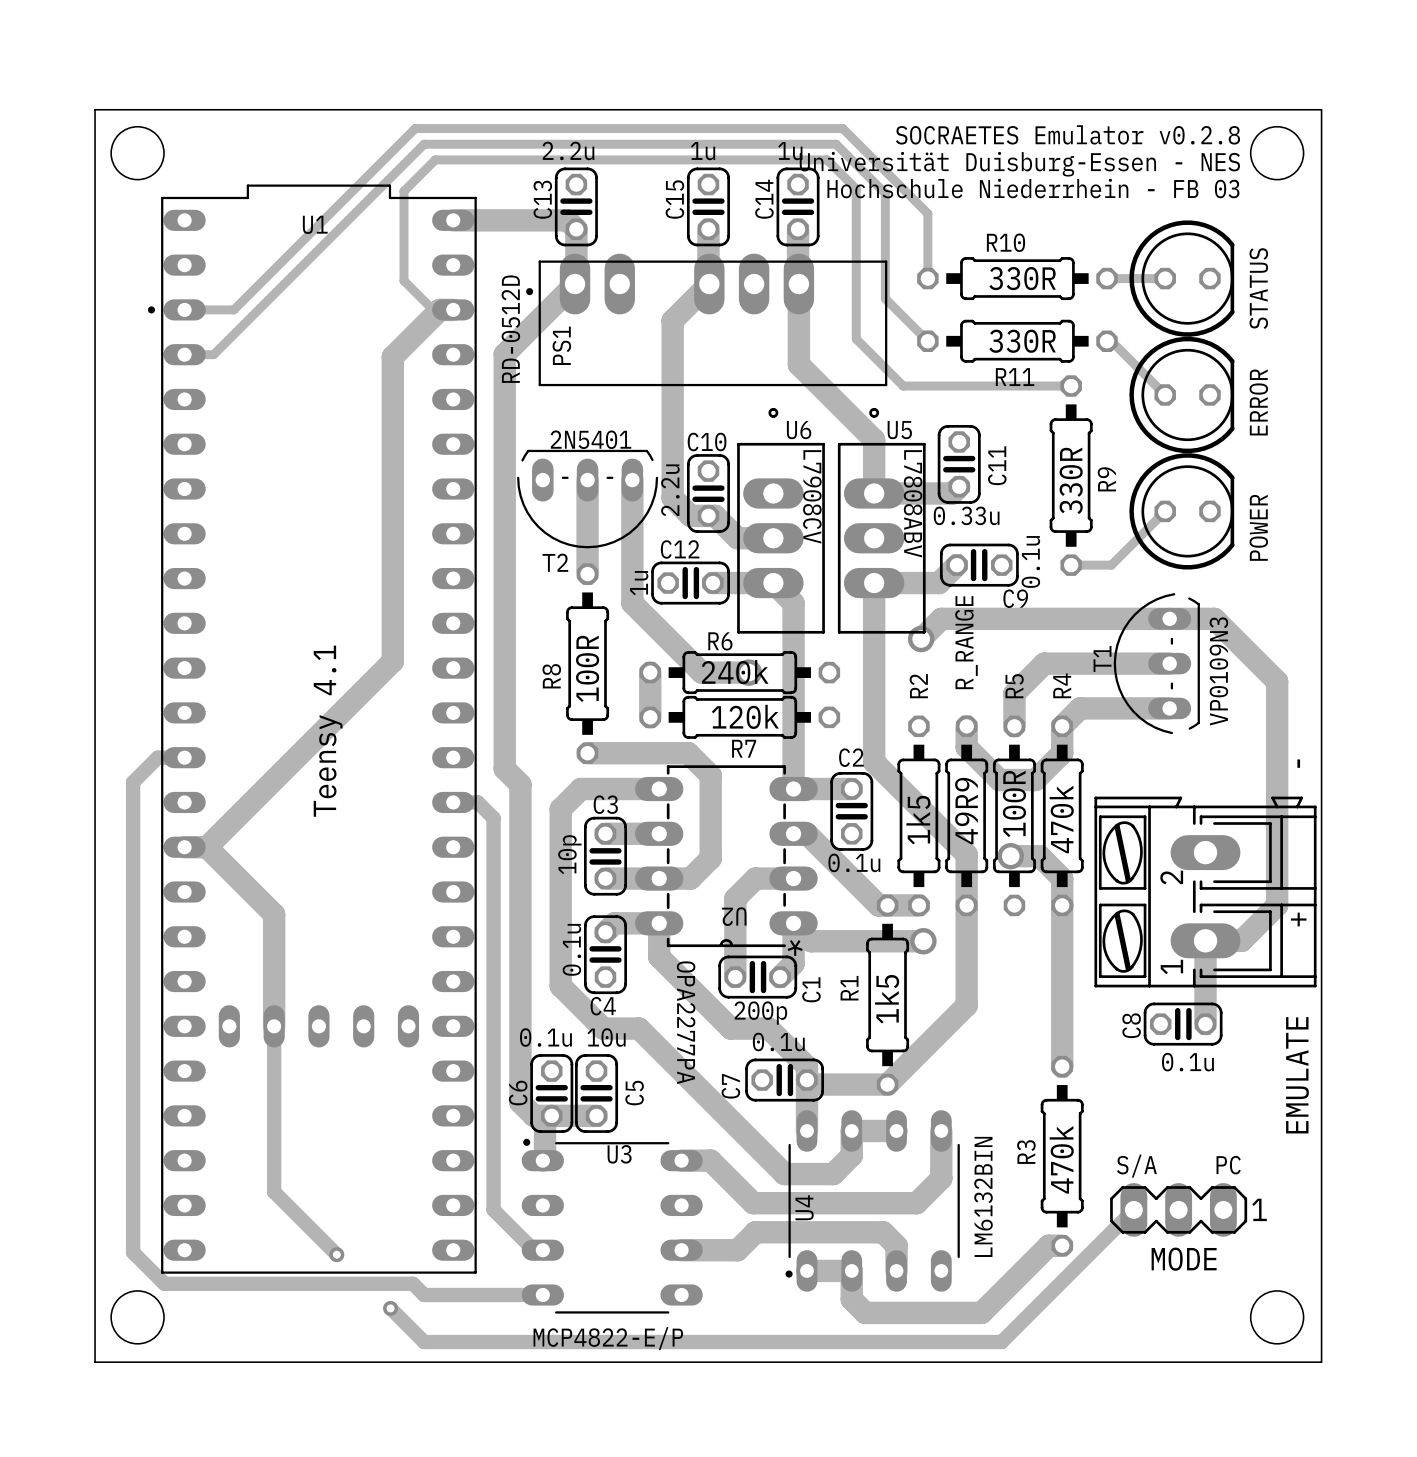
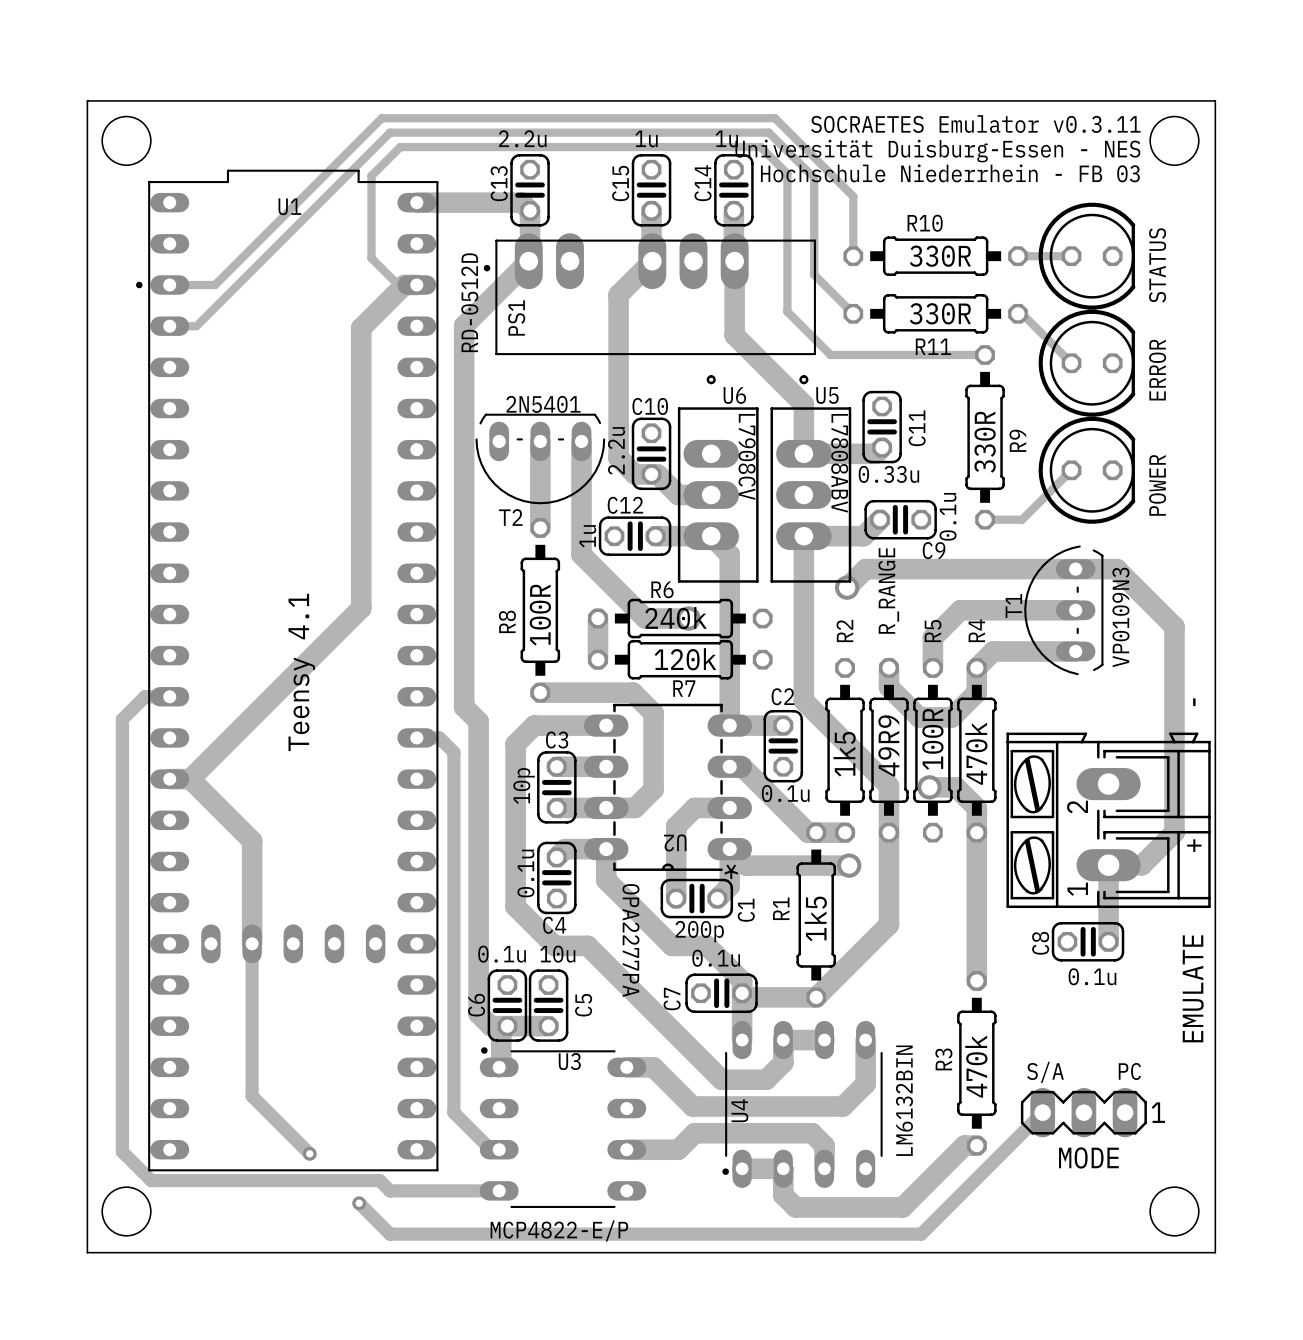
text: SOCRAETES Emulator v0.2.8 (1067, 134) -> SOCRAETES Emulator v0.3.11 (975, 124)

